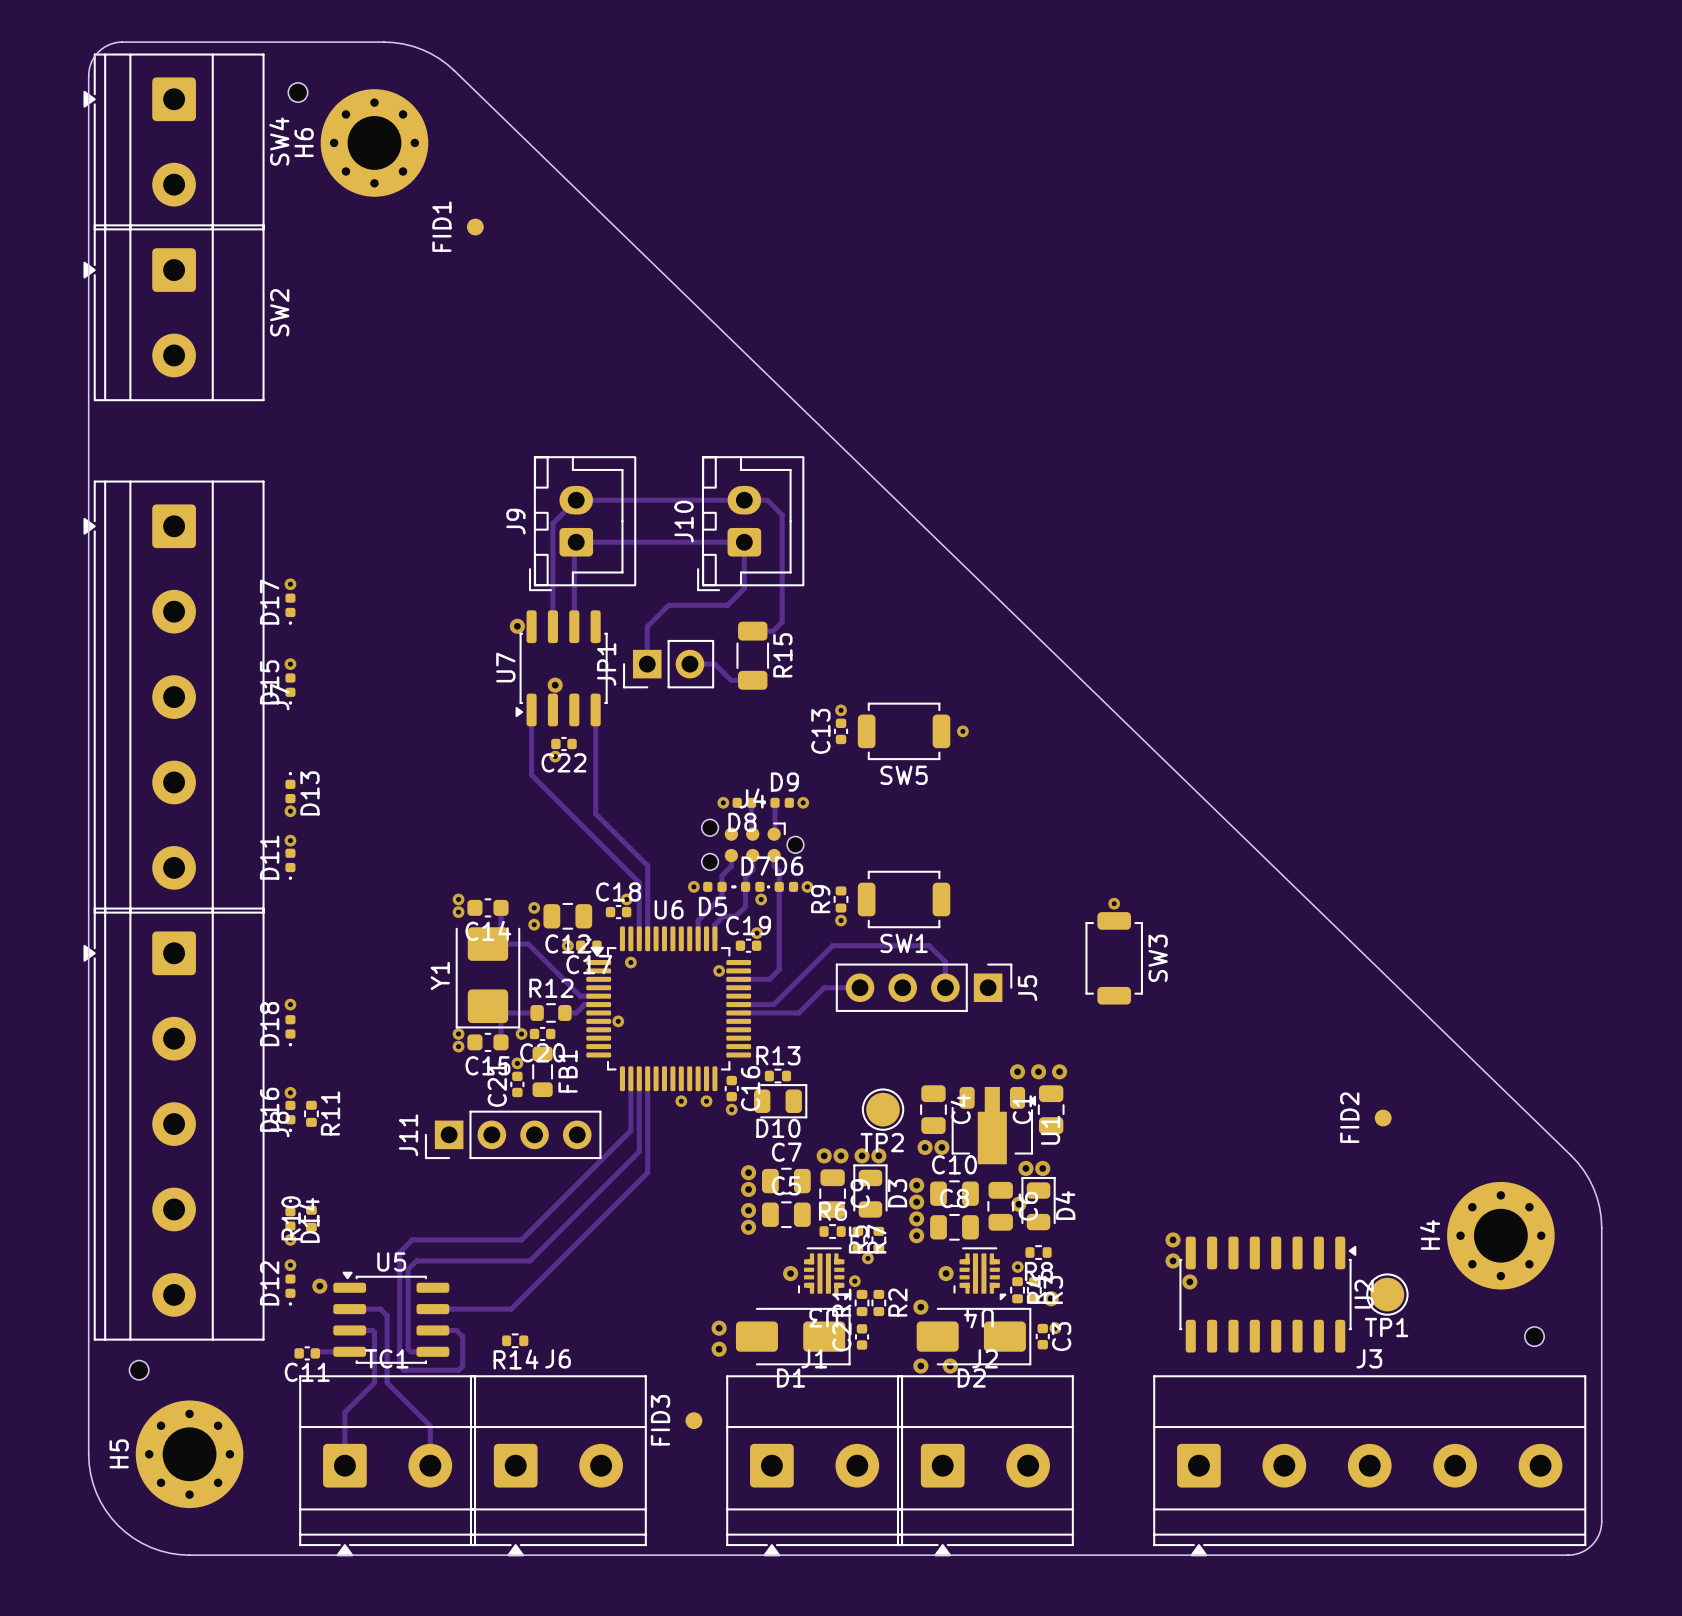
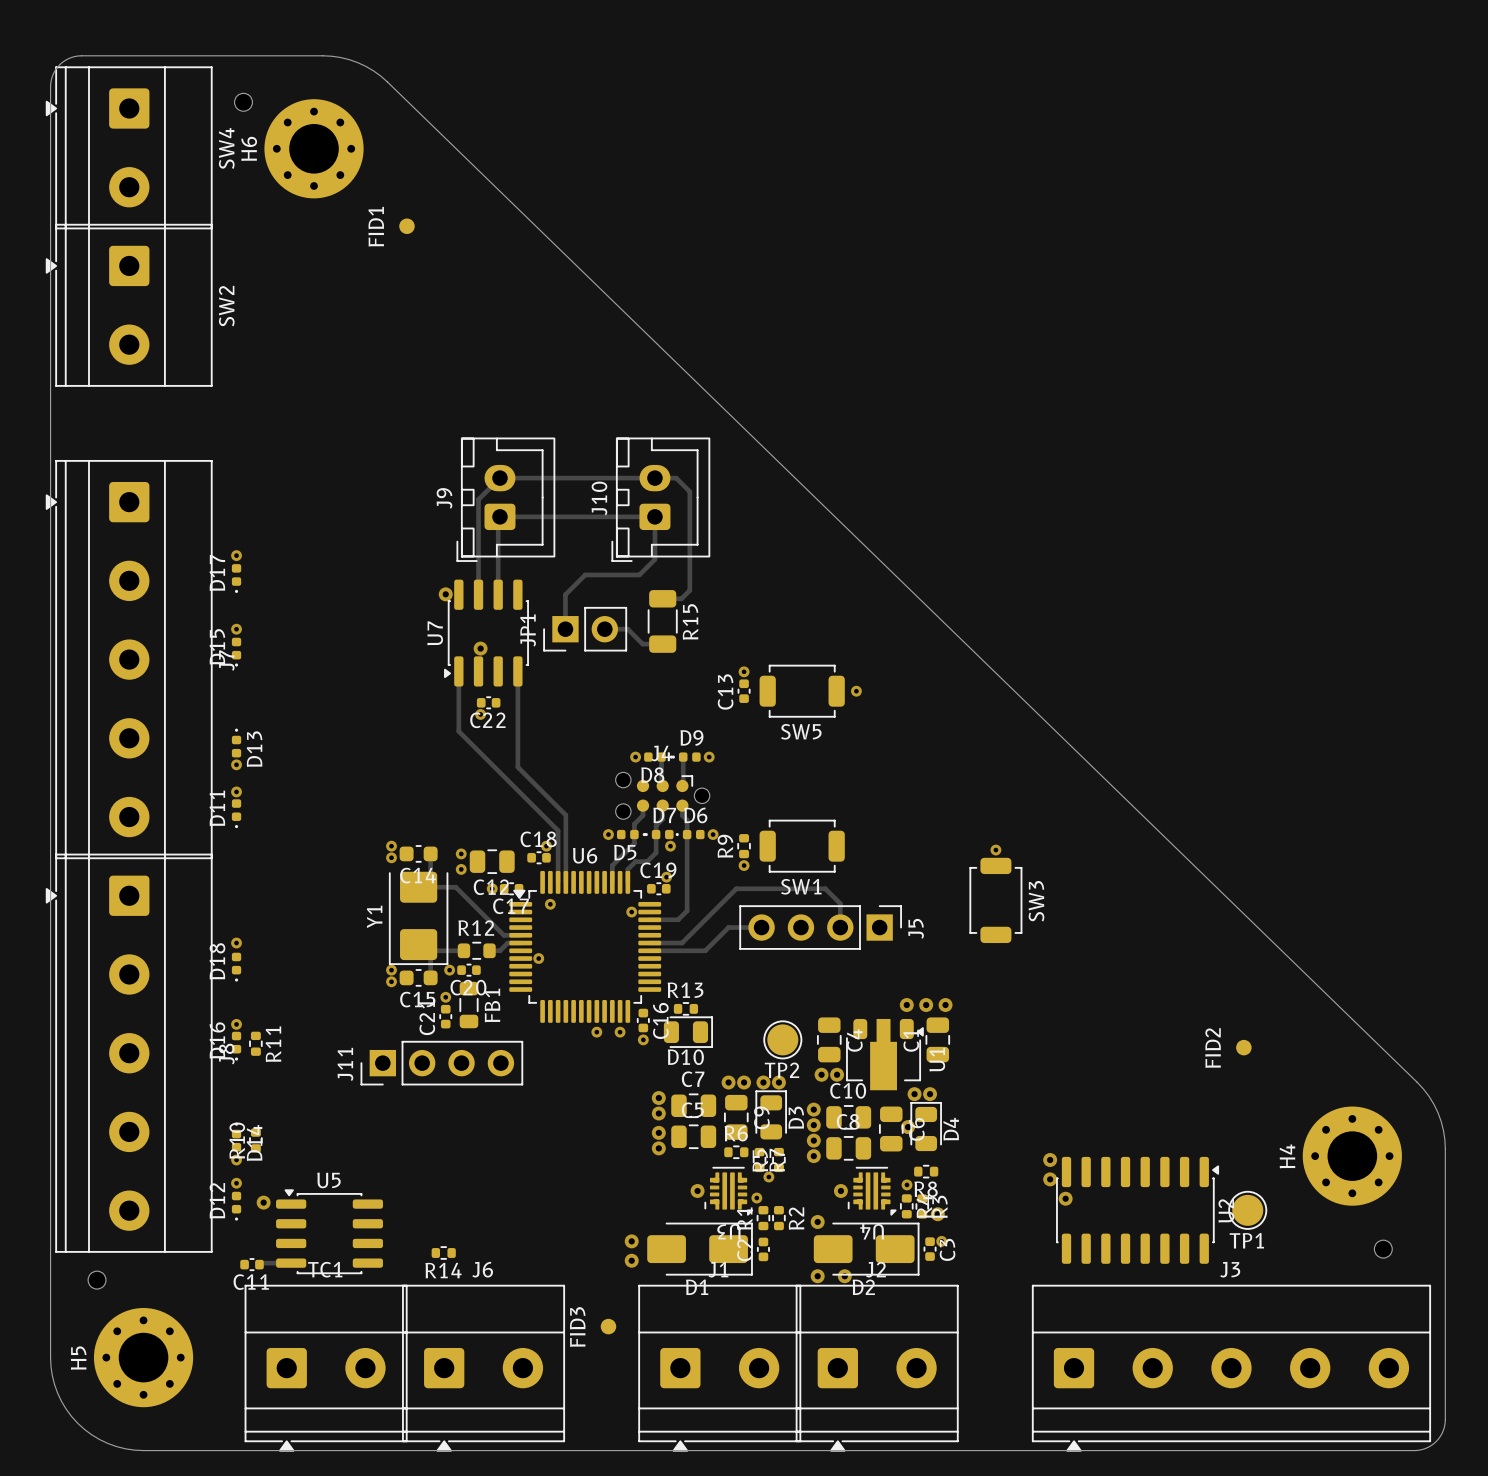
track: (630, 1078) (630, 1130) (521, 1239) (412, 1239) (399, 1252) (399, 1366) (403, 1370) (458, 1370) (462, 1366) (462, 1336) (456, 1330) (432, 1330) -> none
track: (639, 1078) (639, 1151) (530, 1260) (416, 1260) (408, 1269) (408, 1349) (410, 1351) (432, 1351) -> none
track: (647, 1078) (647, 1172) (511, 1309) (432, 1309) -> none
track: (349, 1309) (380, 1309) (387, 1315) (387, 1382) (430, 1426) (430, 1465) -> none
track: (349, 1330) (372, 1330) (374, 1332) (374, 1382) (344, 1412) (344, 1465) -> none

